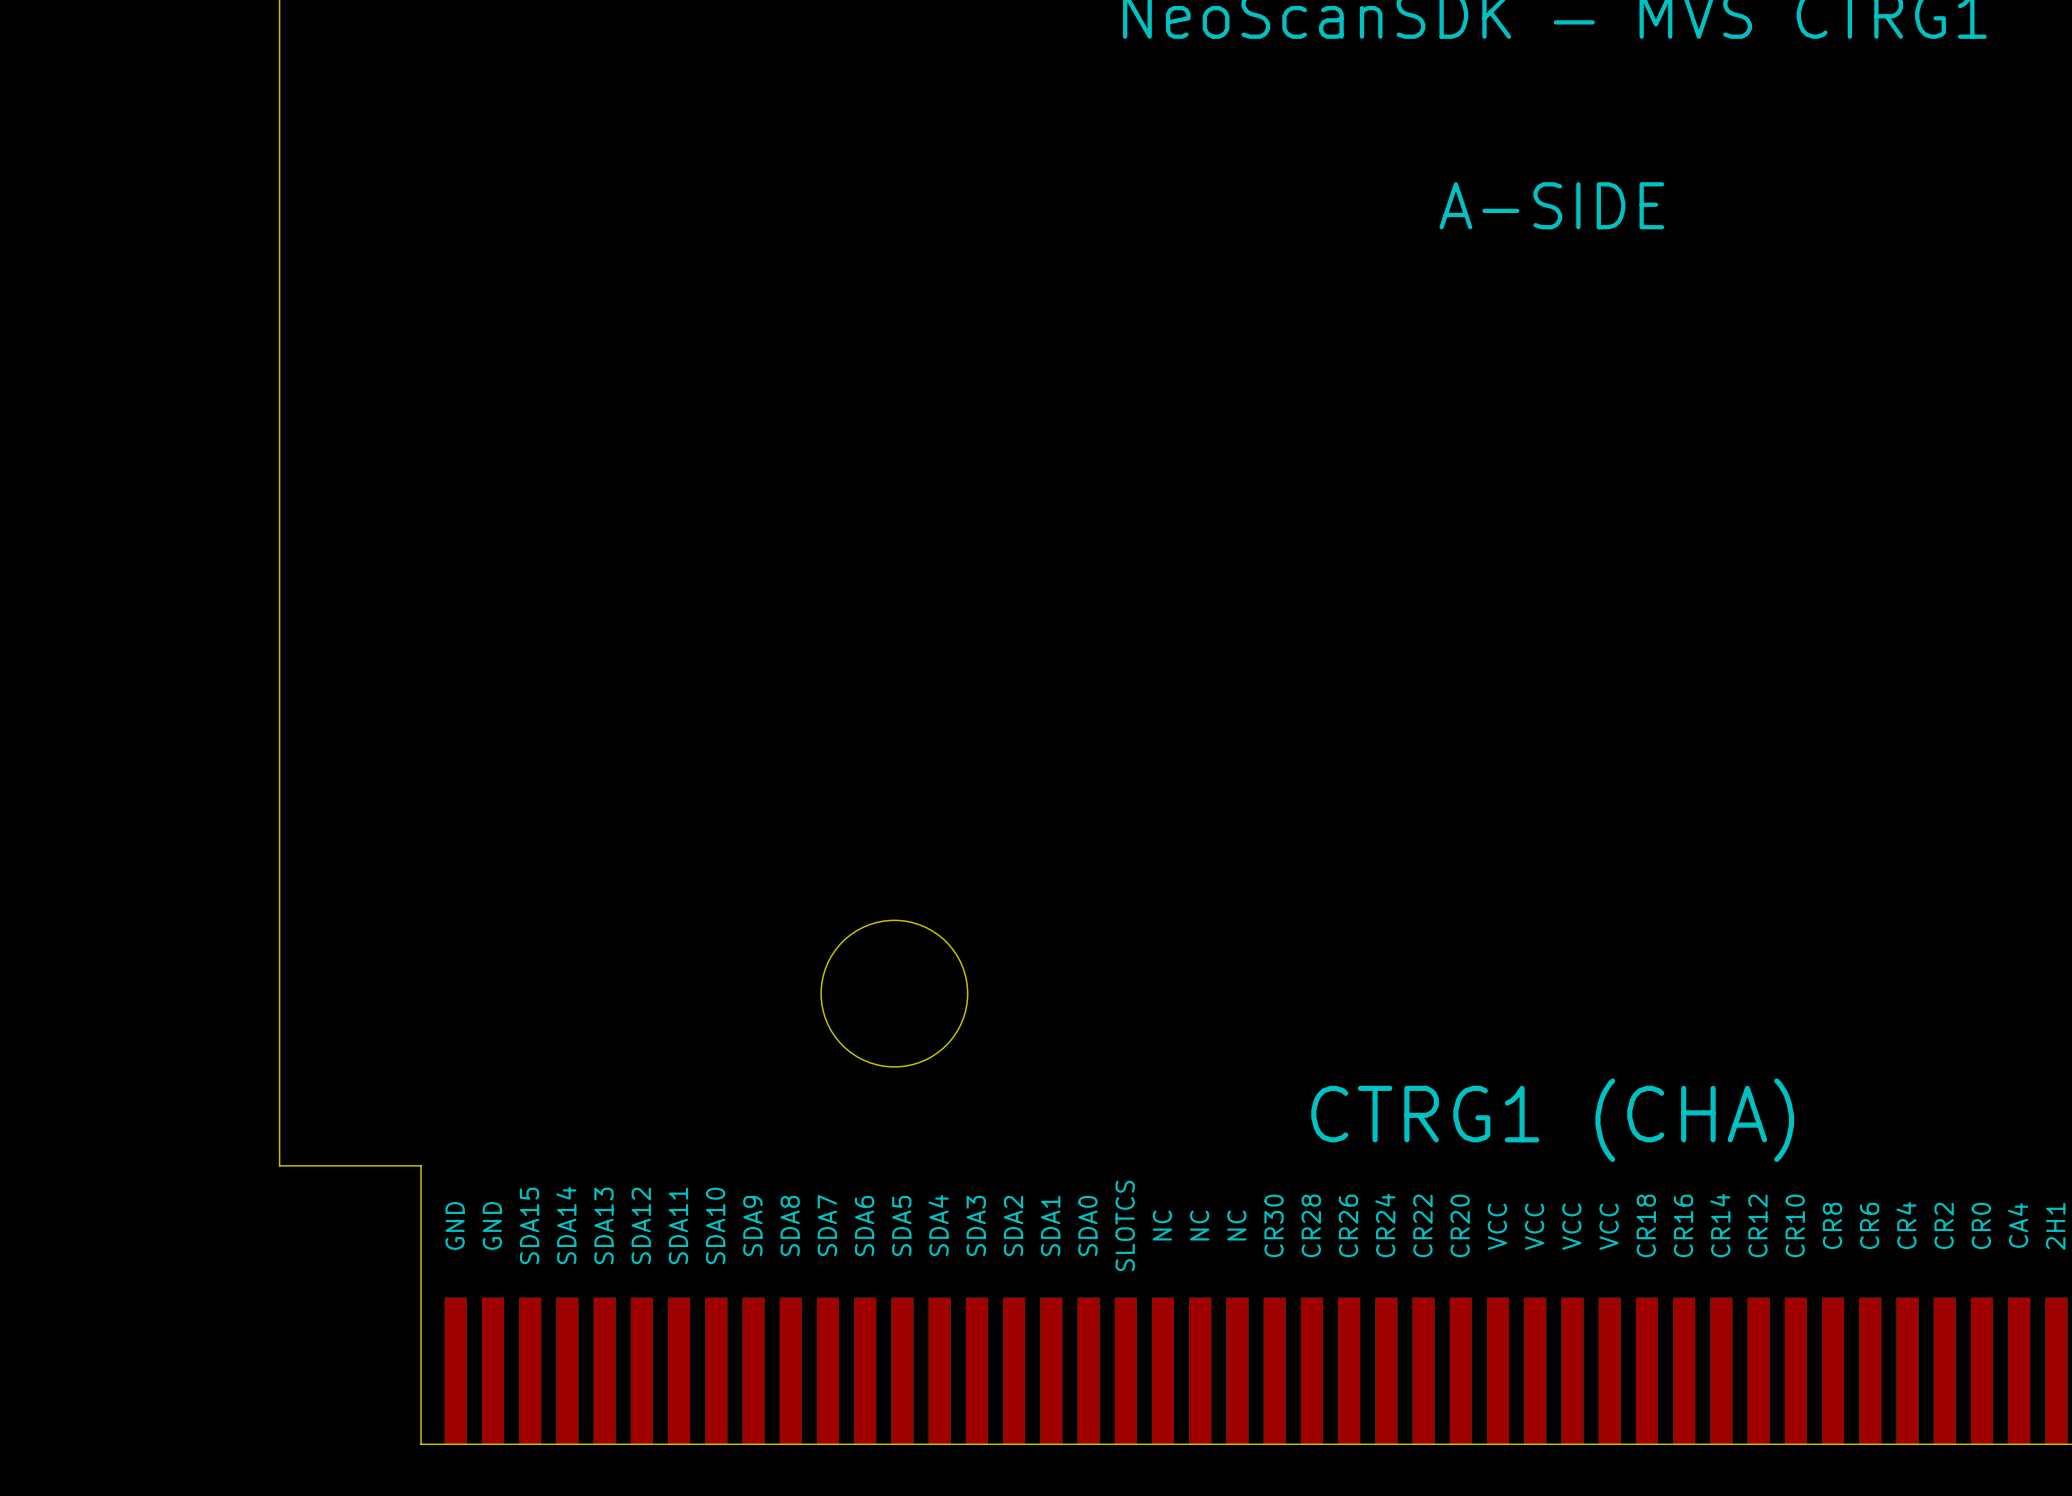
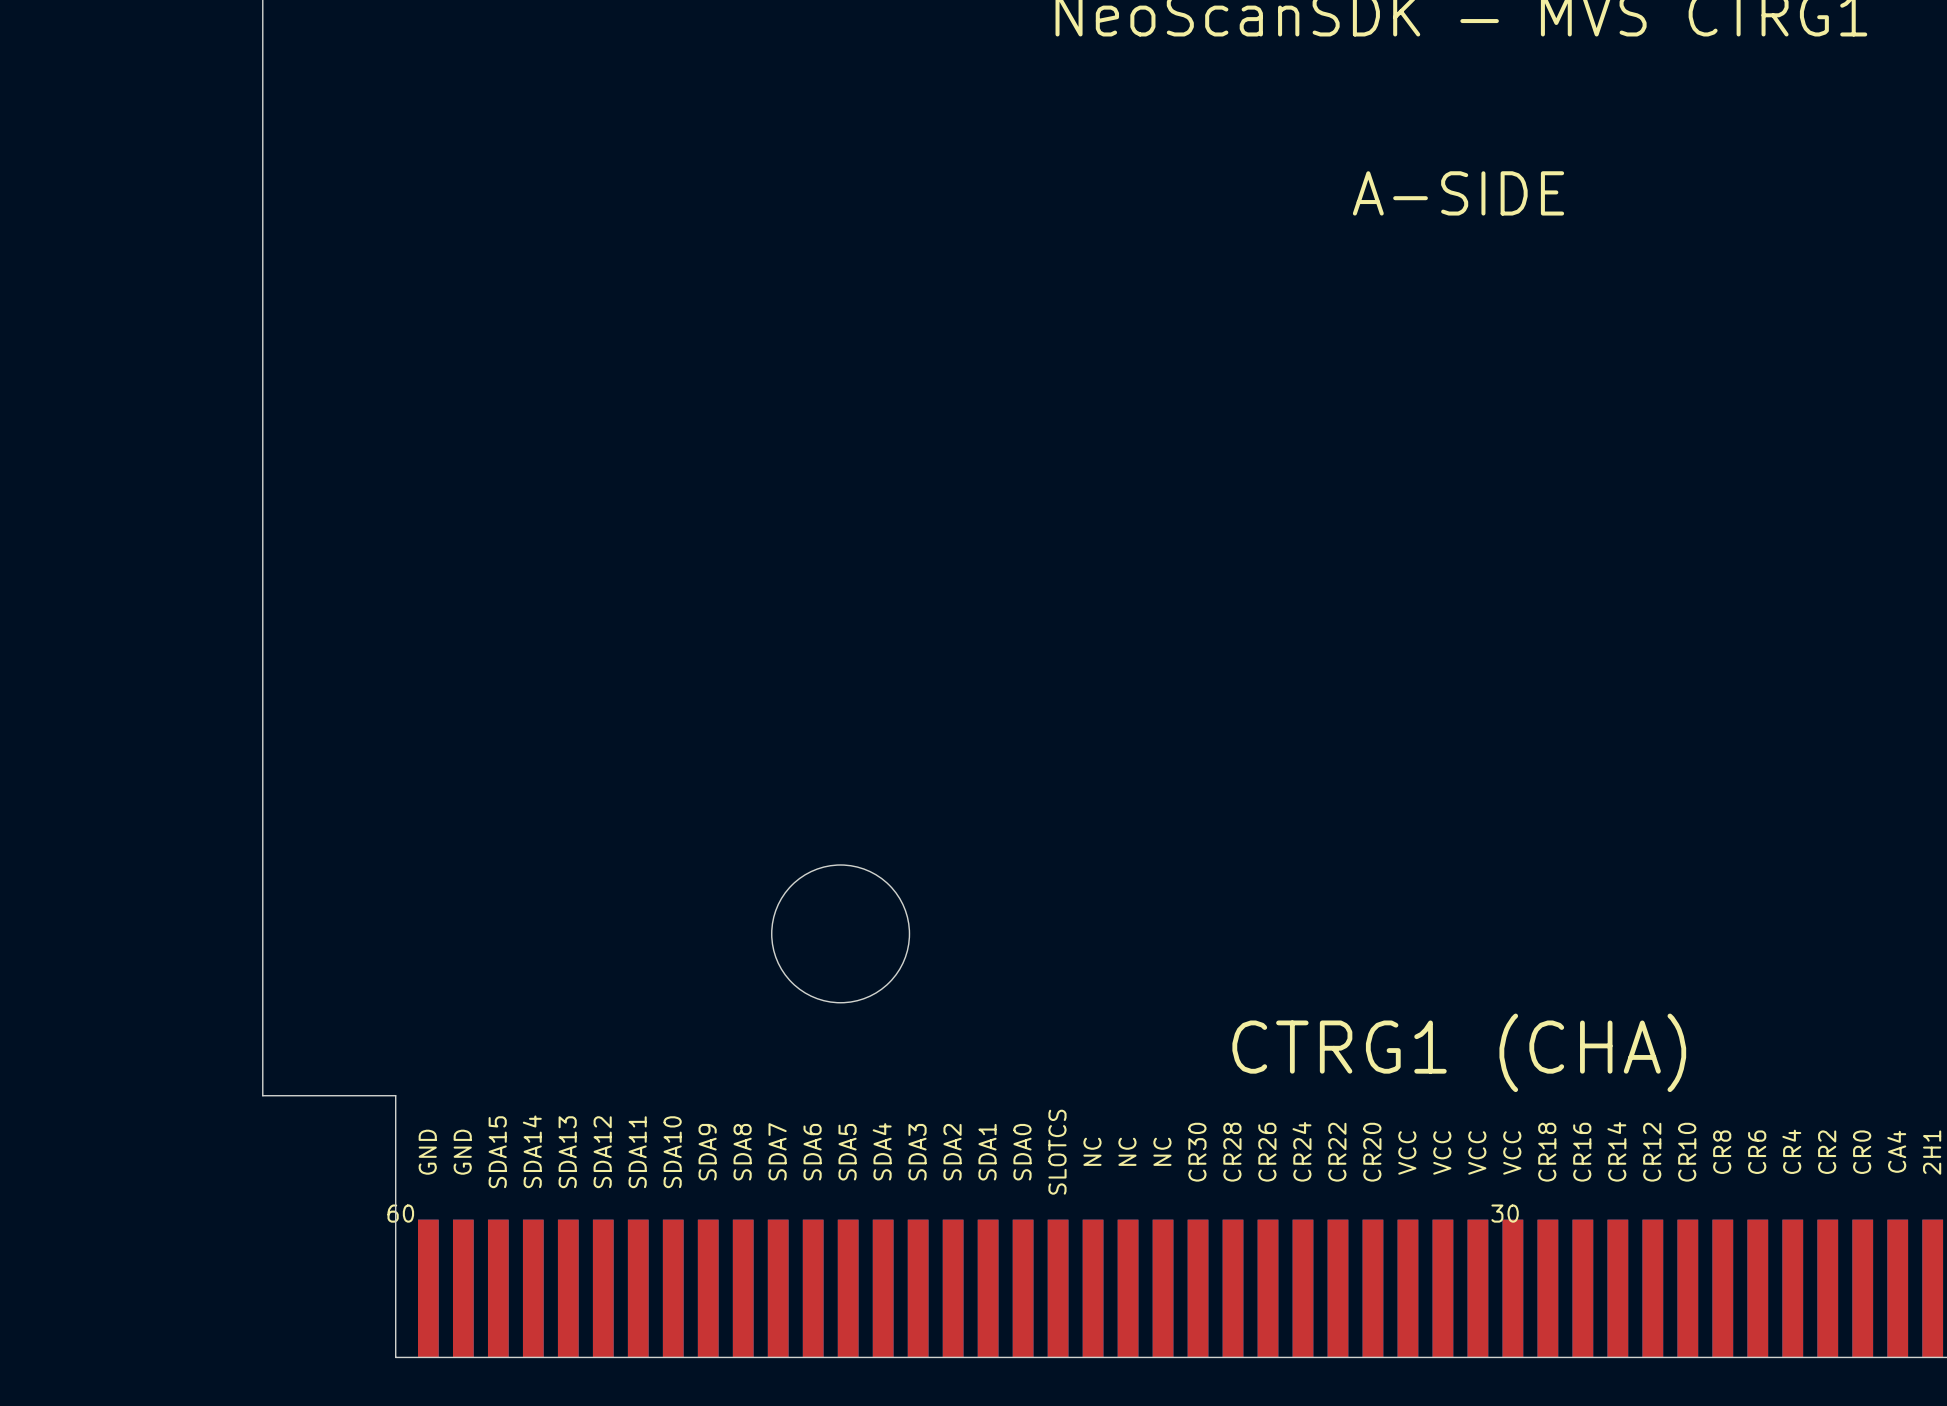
text: none -> 60 (400, 1213)
text: none -> 30 (1505, 1213)

